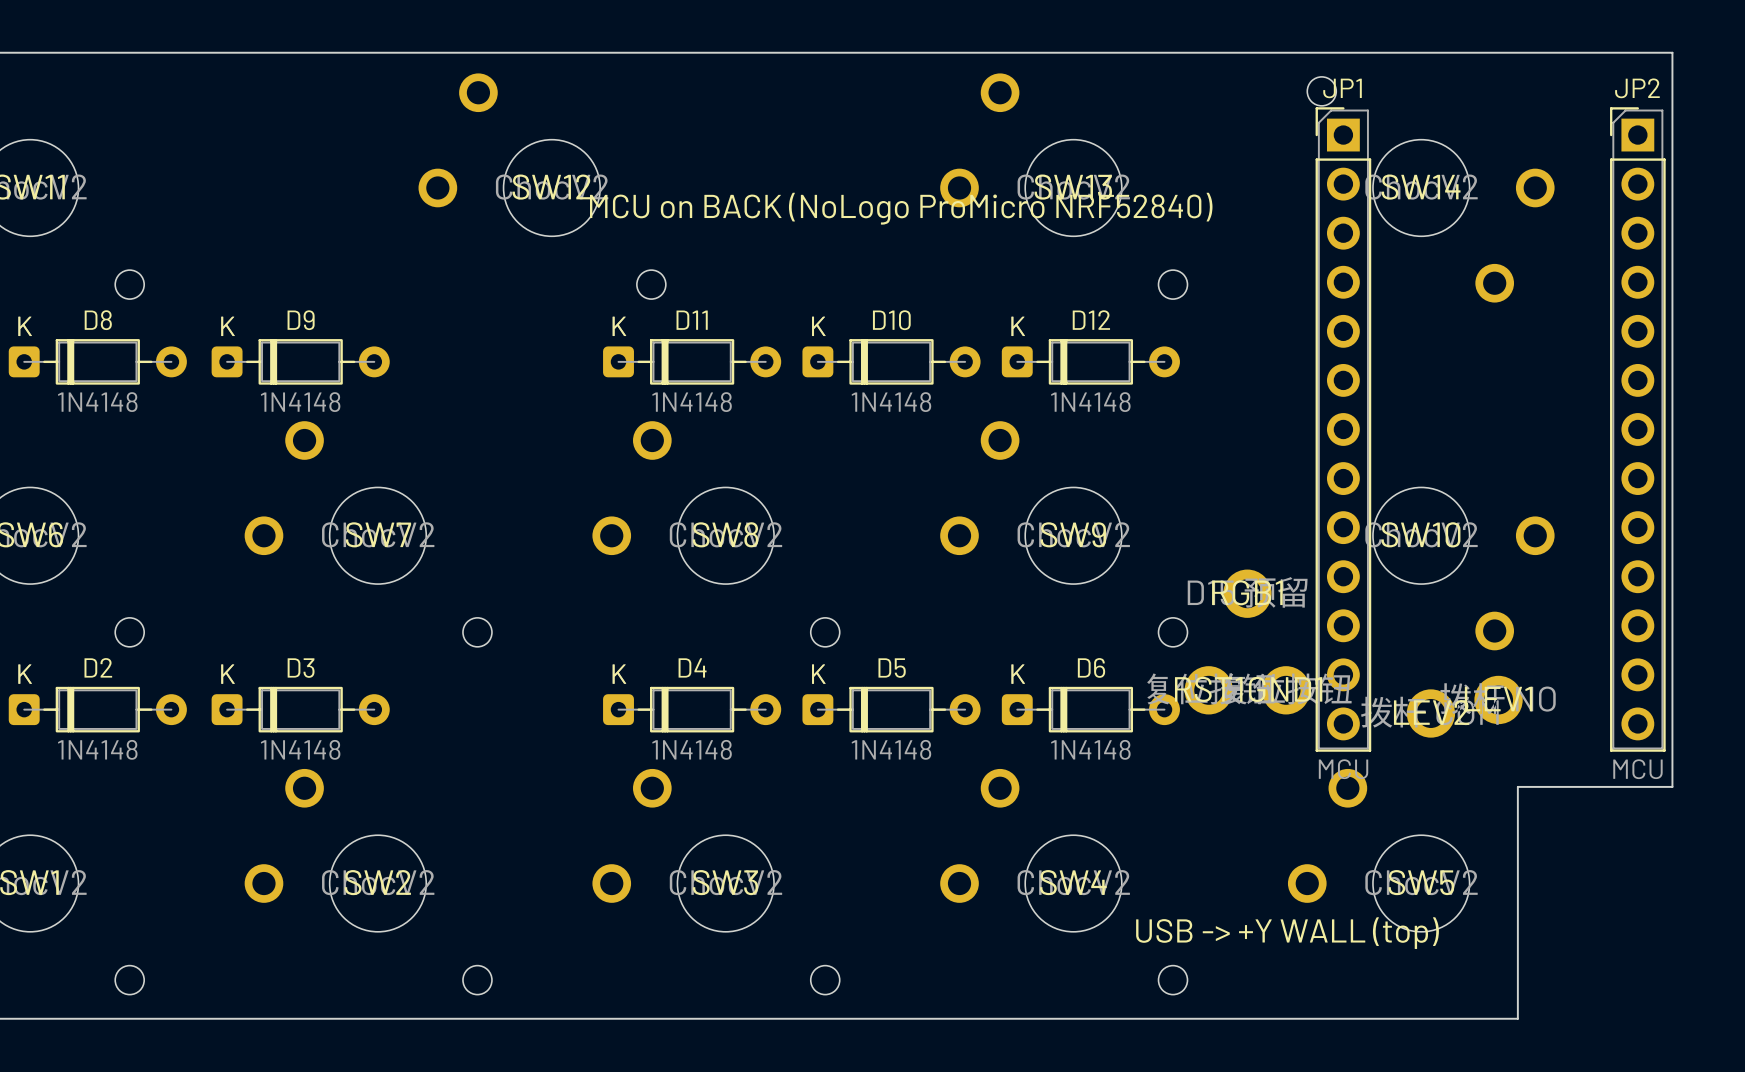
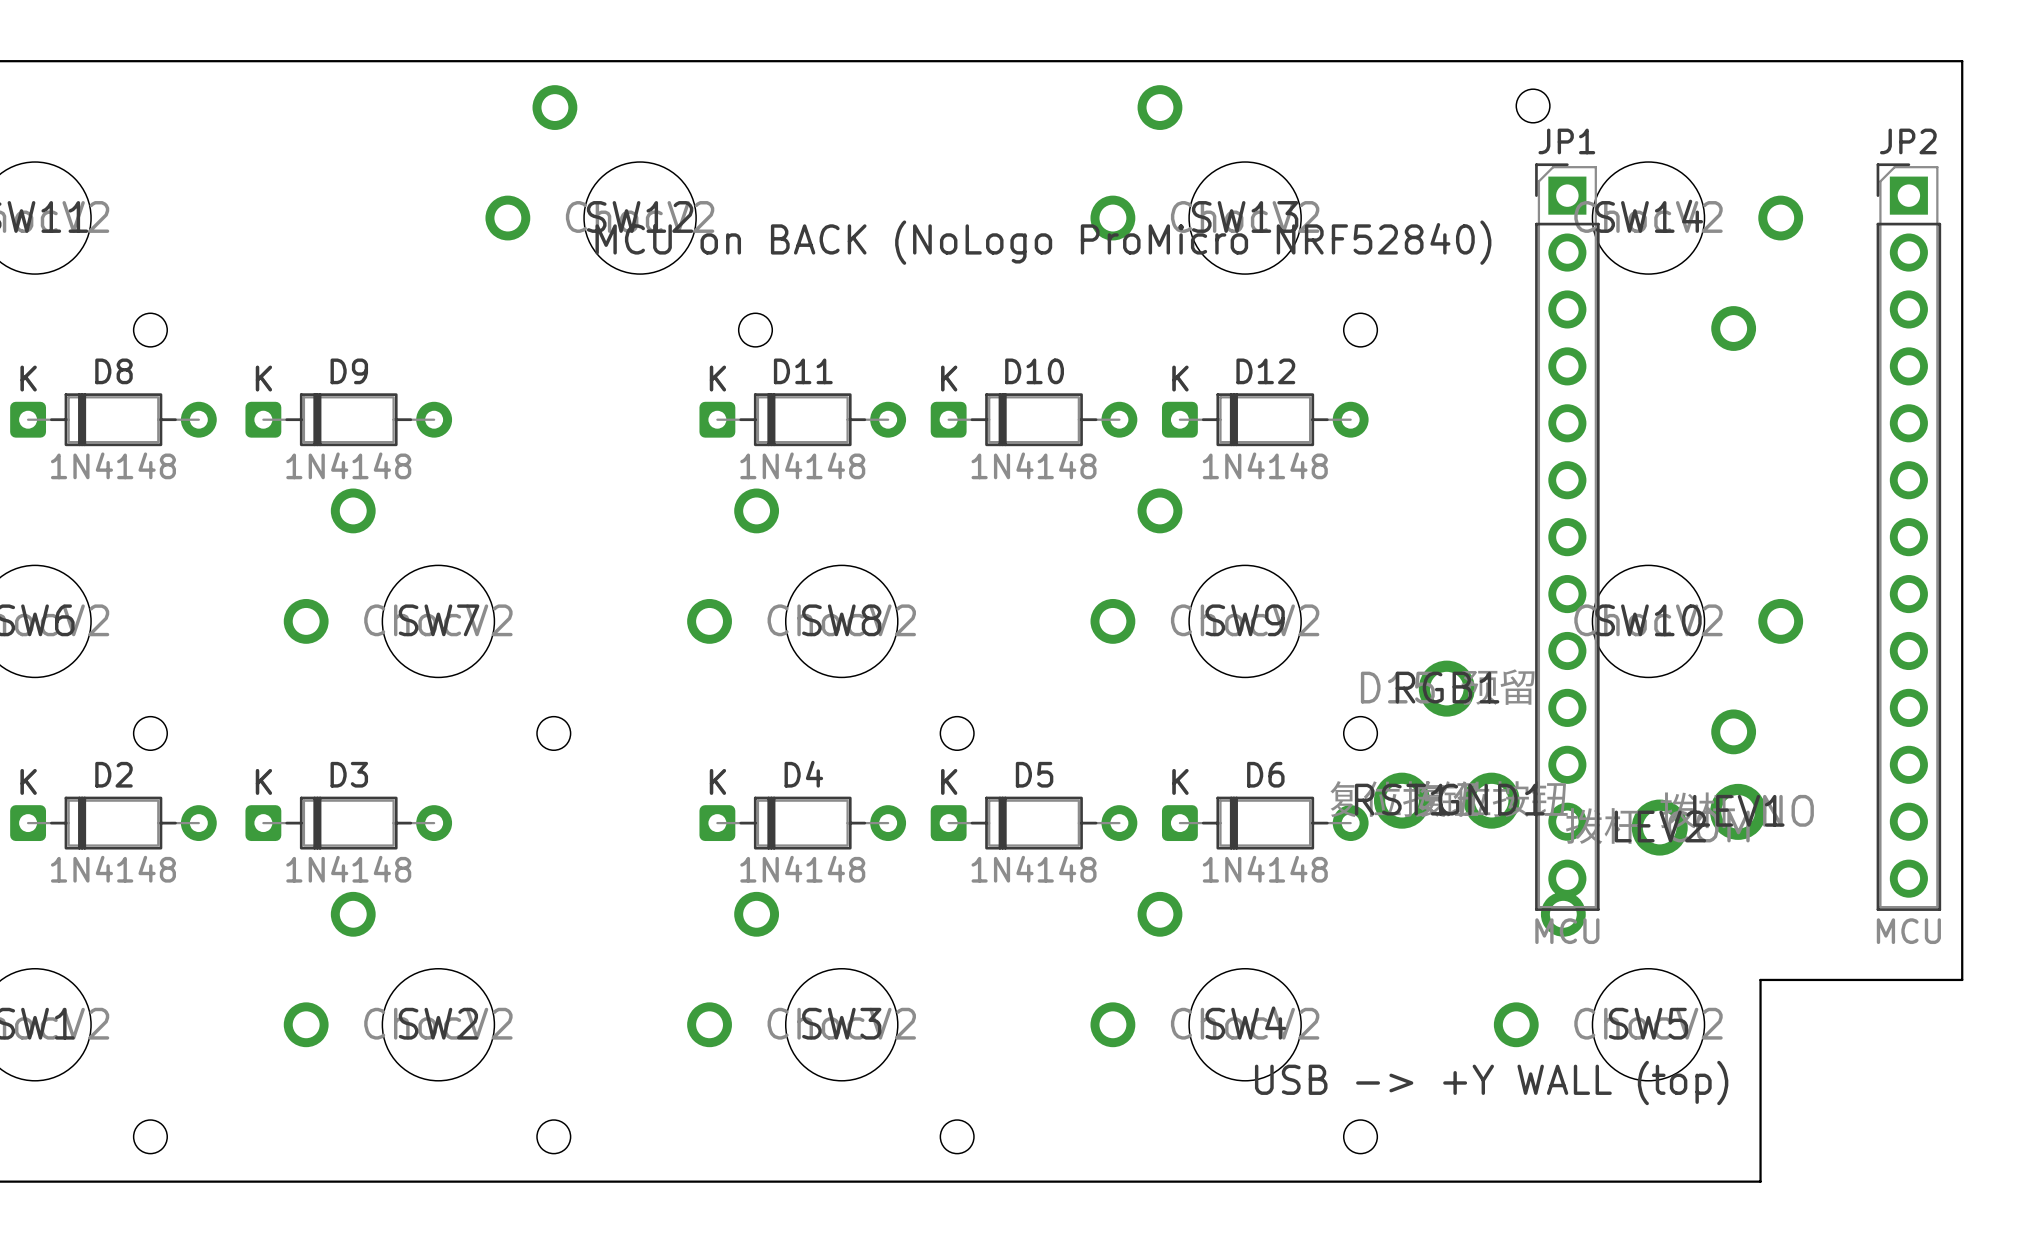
board edge: (1672, 52) (1672, 786) (1517, 786) (1517, 844) -> (1939, 61) (1962, 61) (1962, 979) (1760, 979)
JP1 position: (1343, 429) -> (1567, 537)
JP2 position: (1637, 429) -> (1908, 537)

